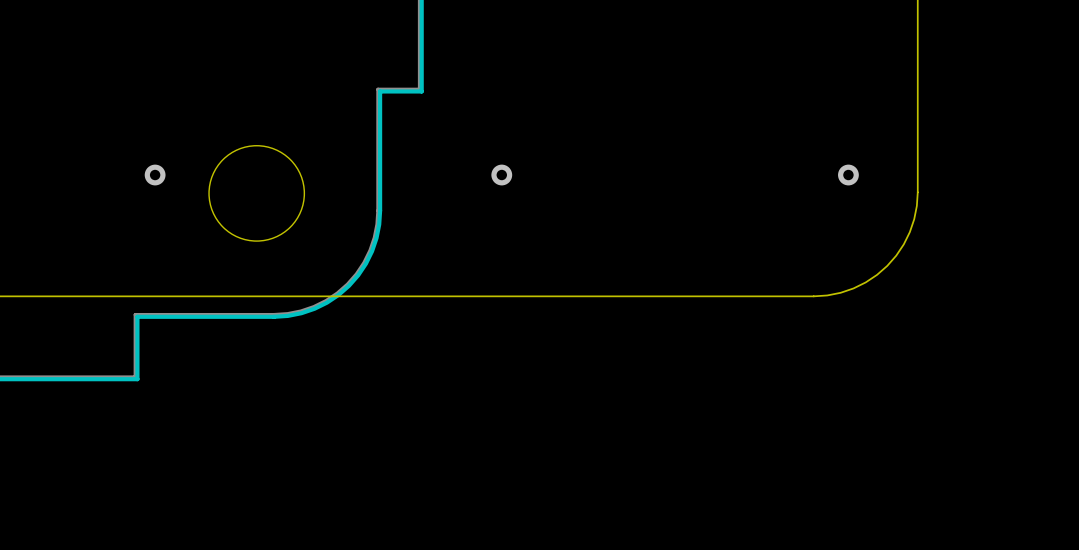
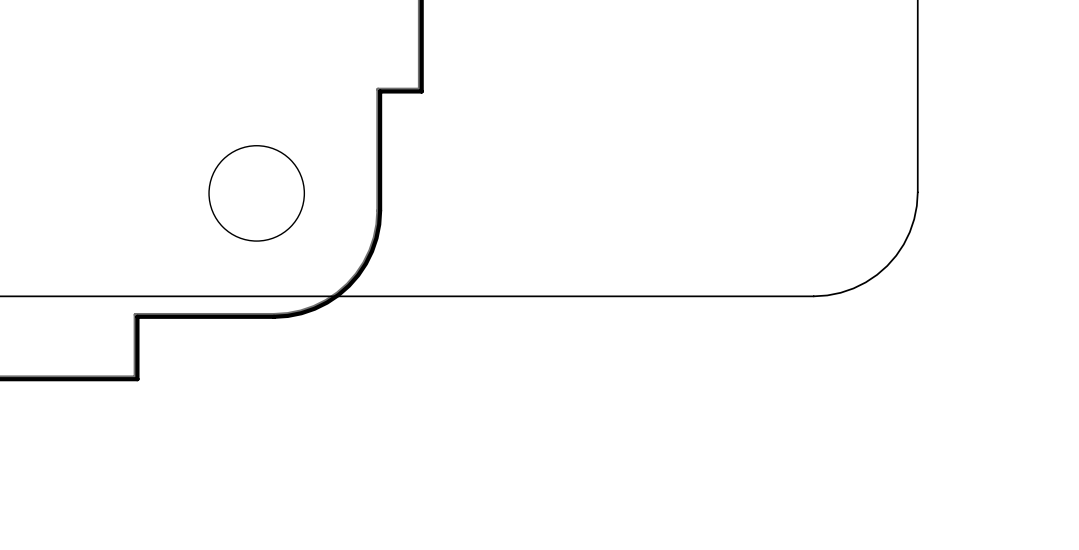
via: (155, 175) -> none
via: (501, 175) -> none
via: (848, 175) -> none

